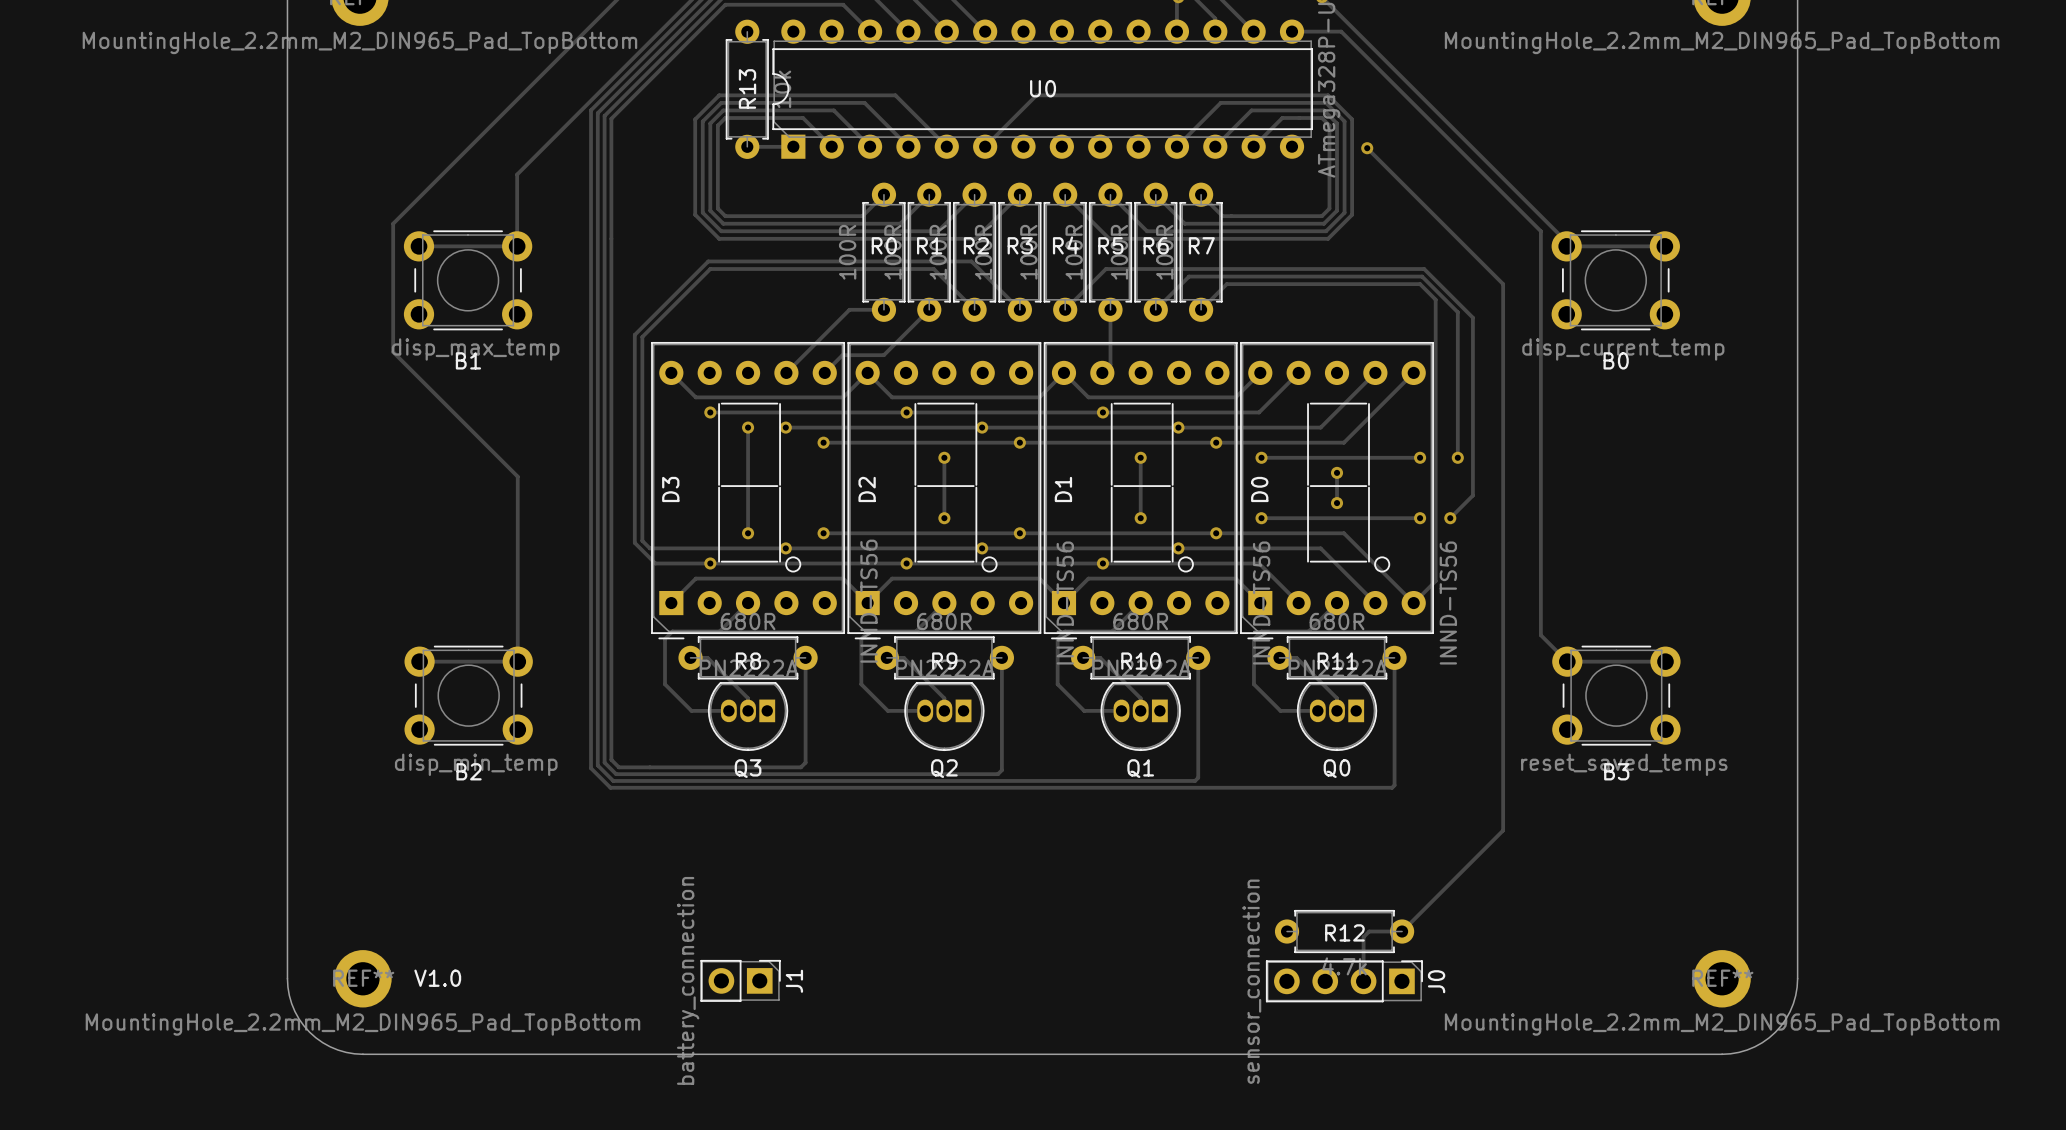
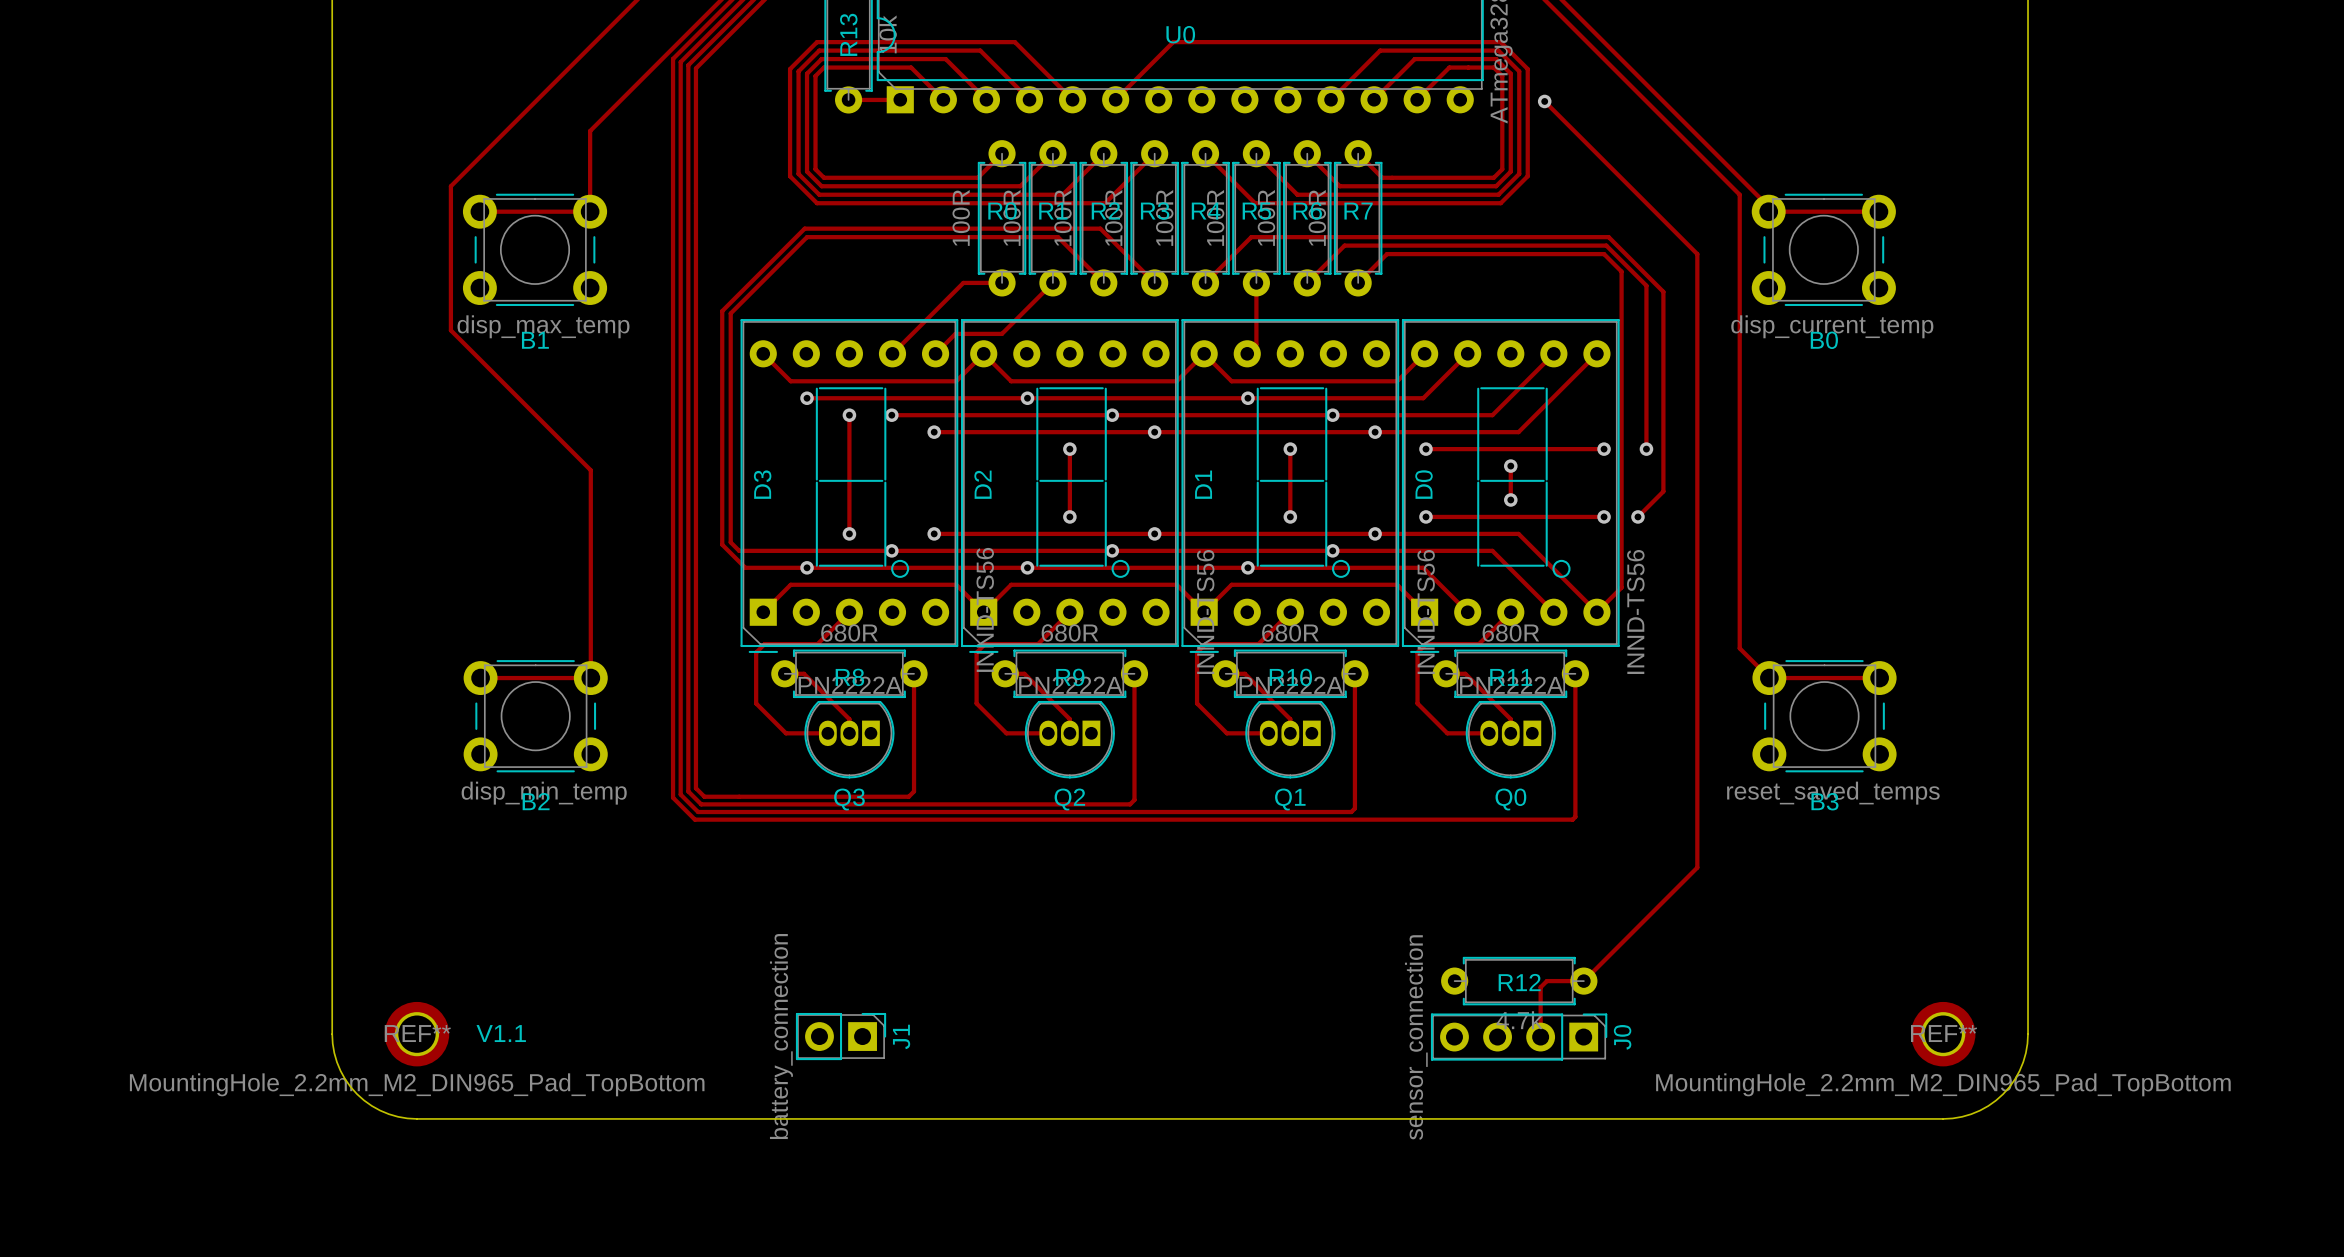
text: V1.0 (437, 978) -> V1.1 (501, 1033)

